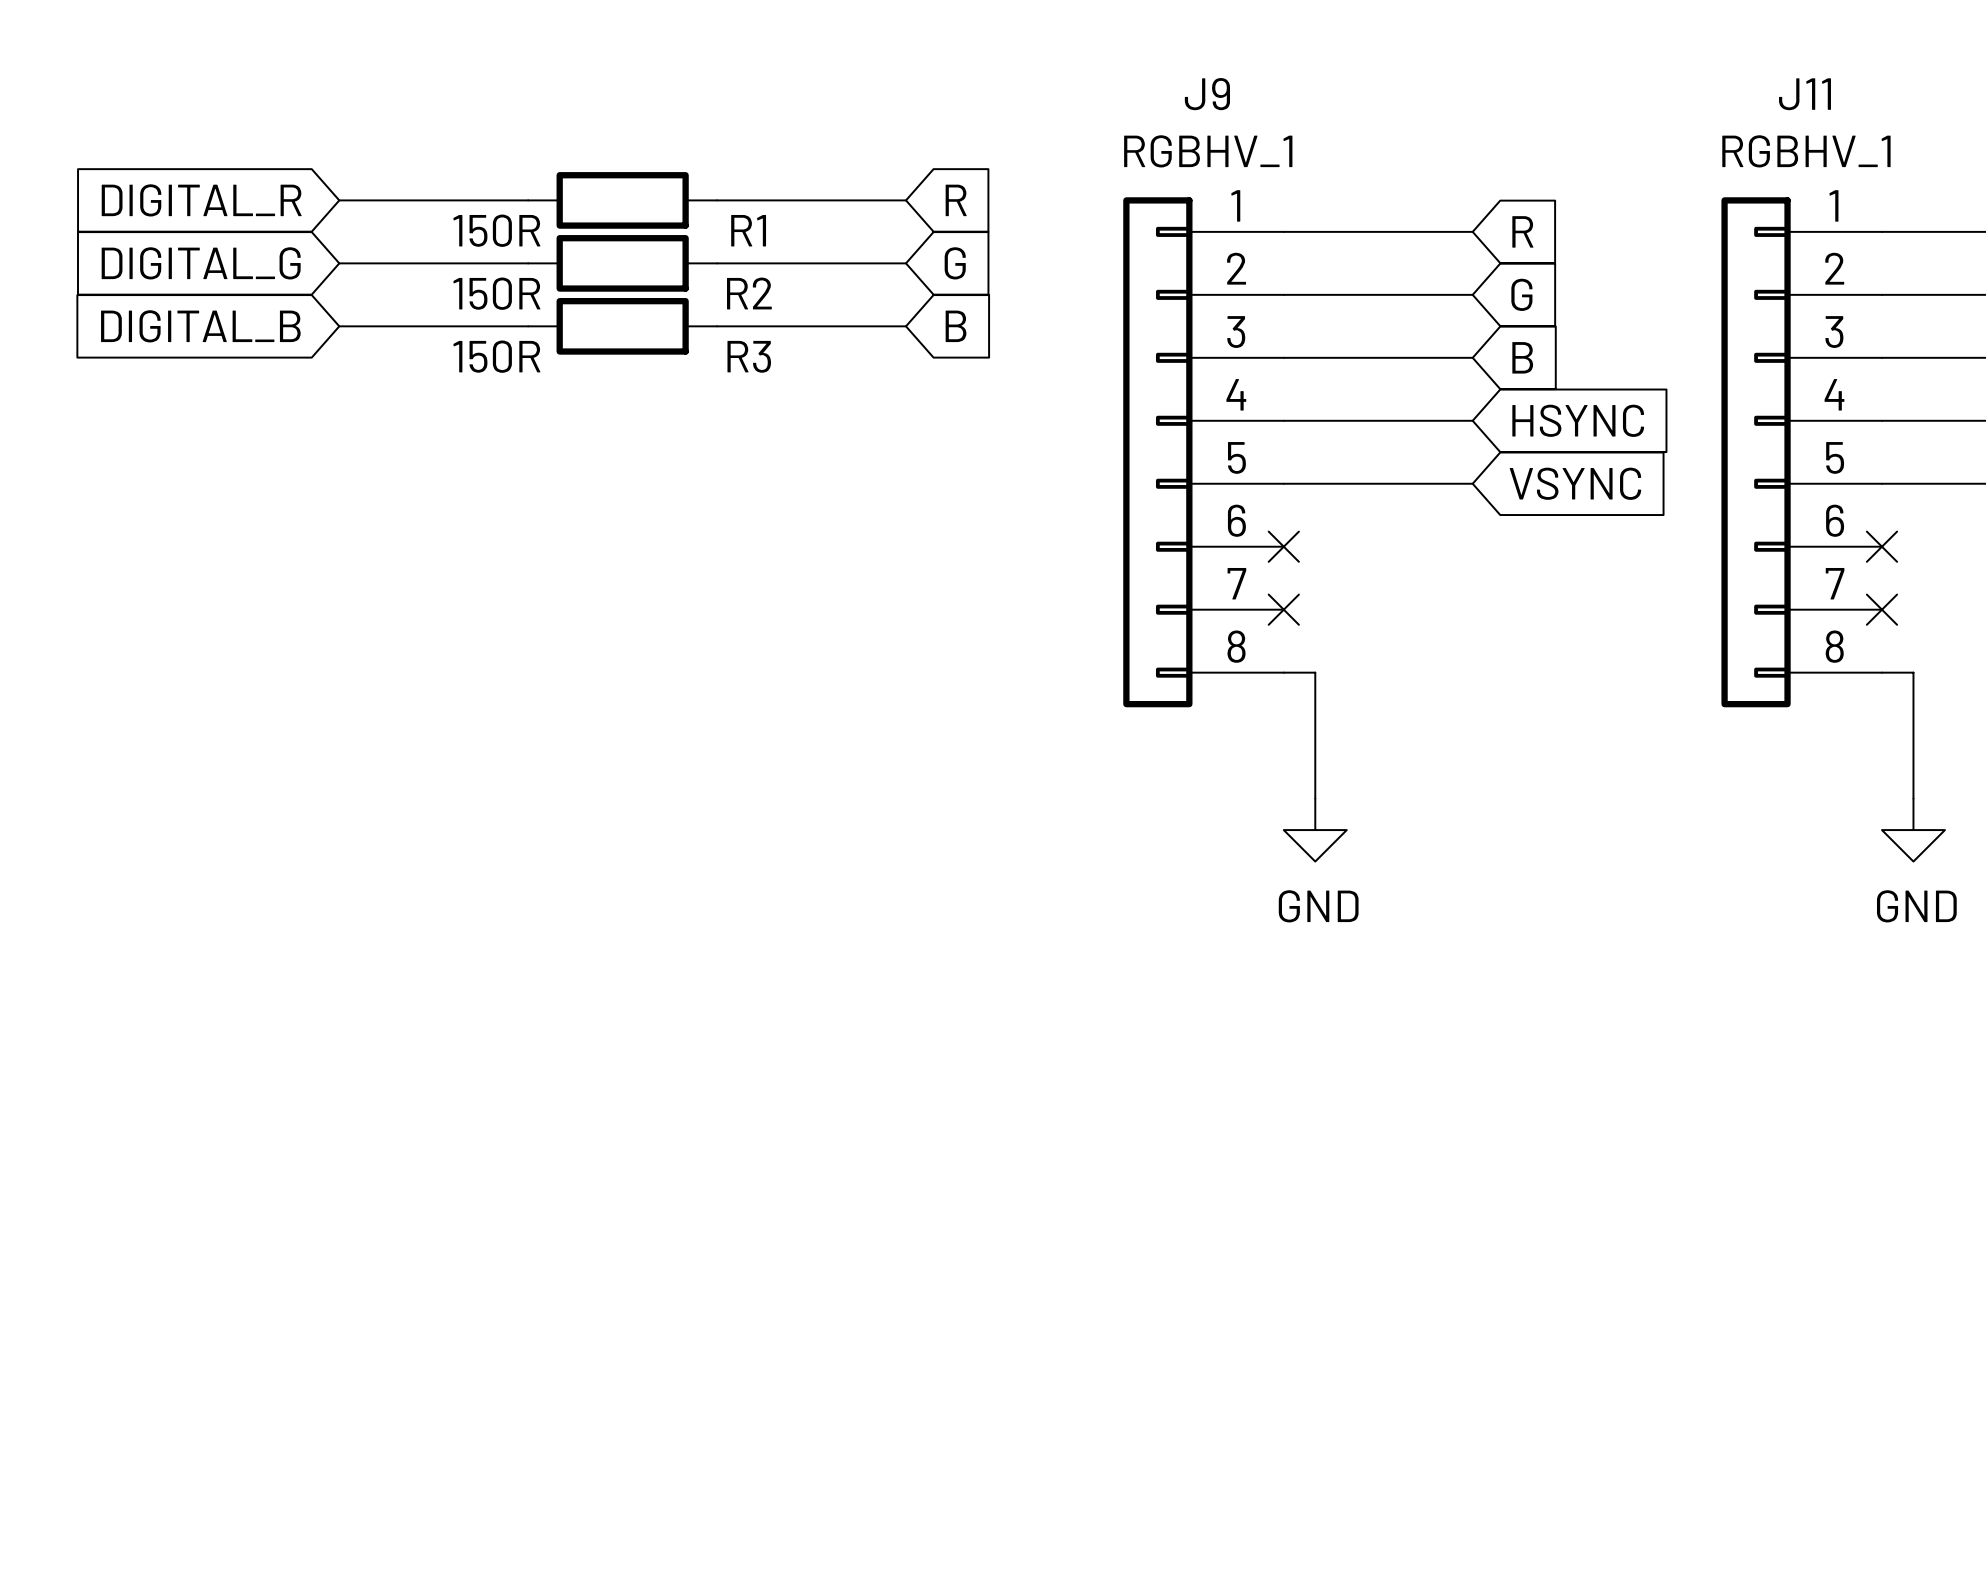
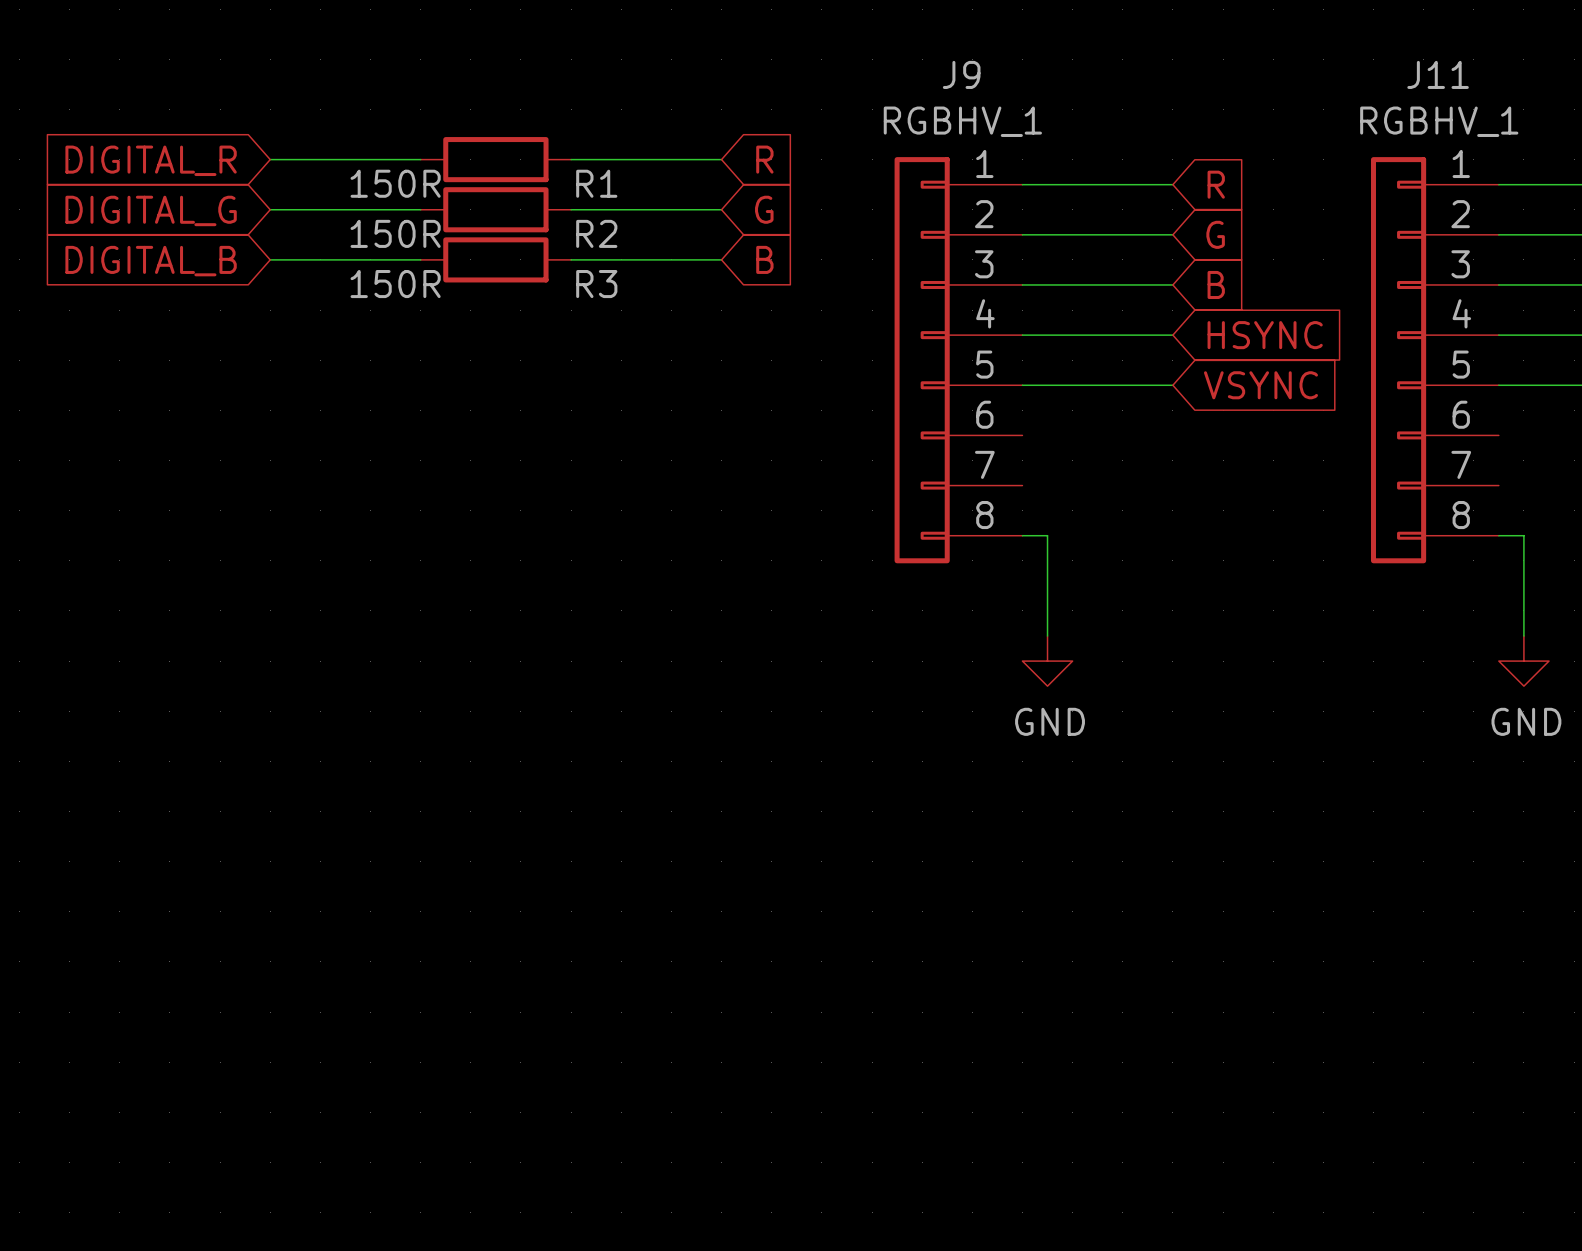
no-connect mark: (1283, 546) -> none
no-connect mark: (1881, 546) -> none
no-connect mark: (1283, 609) -> none
no-connect mark: (1881, 609) -> none

